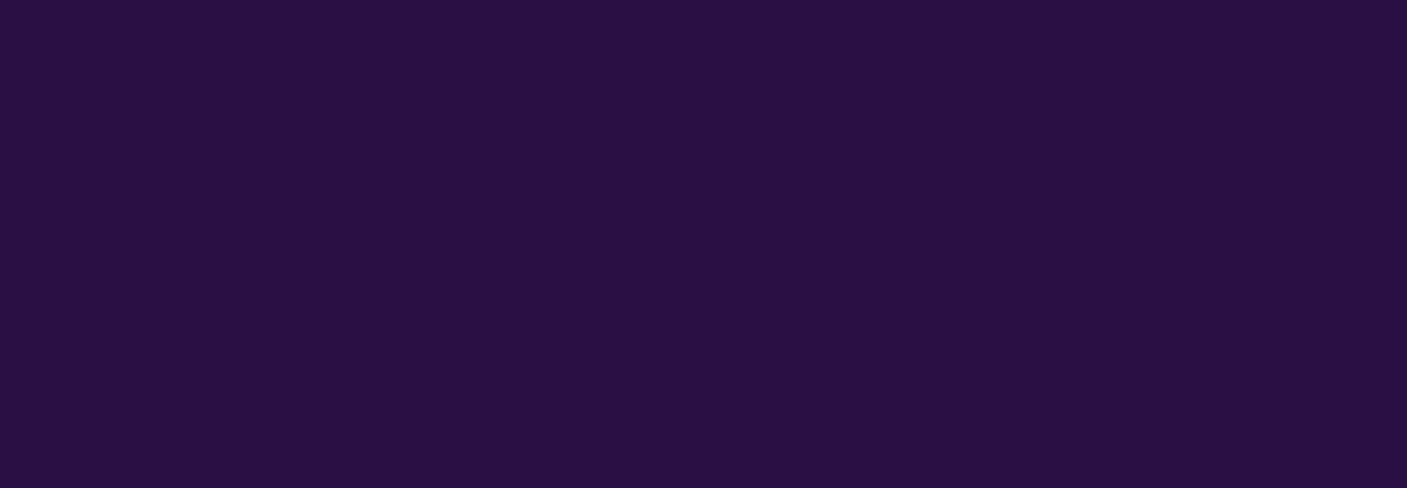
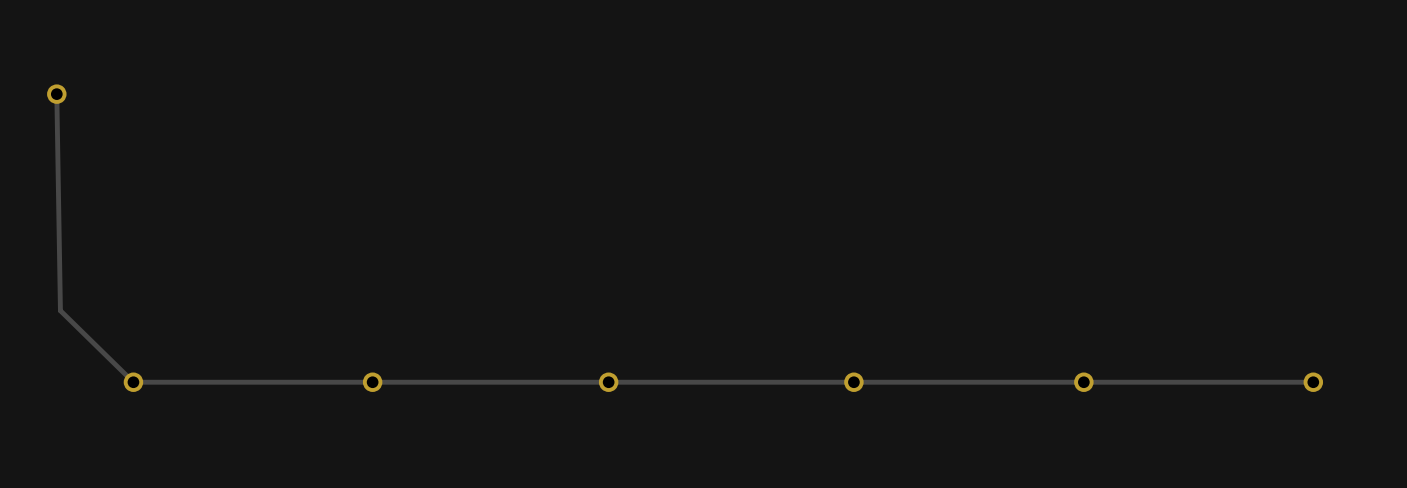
track: none -> (56, 94) (60, 310) (133, 382) (1313, 382)
via: none -> (56, 94)
via: none -> (133, 382)
via: none -> (372, 382)
via: none -> (608, 382)
via: none -> (853, 382)
via: none -> (1083, 382)
via: none -> (1313, 382)

